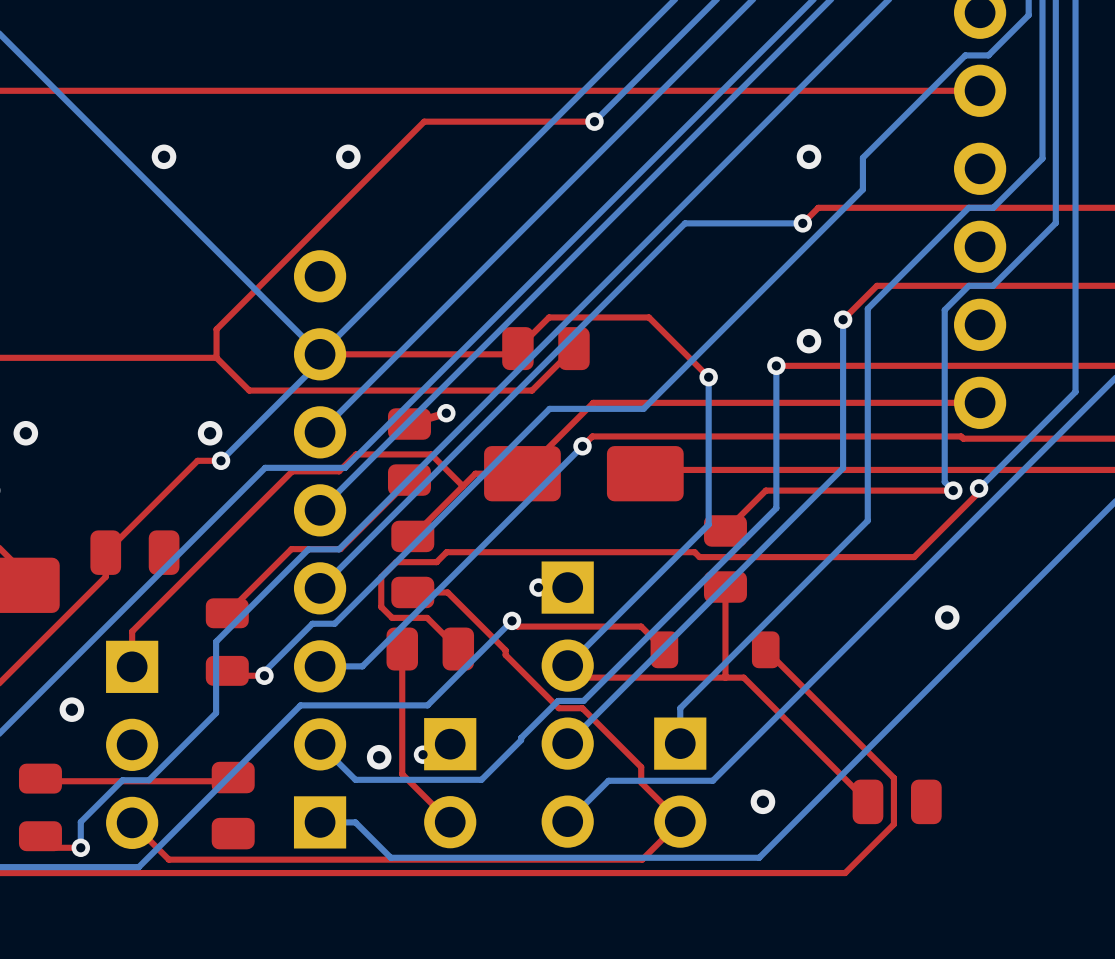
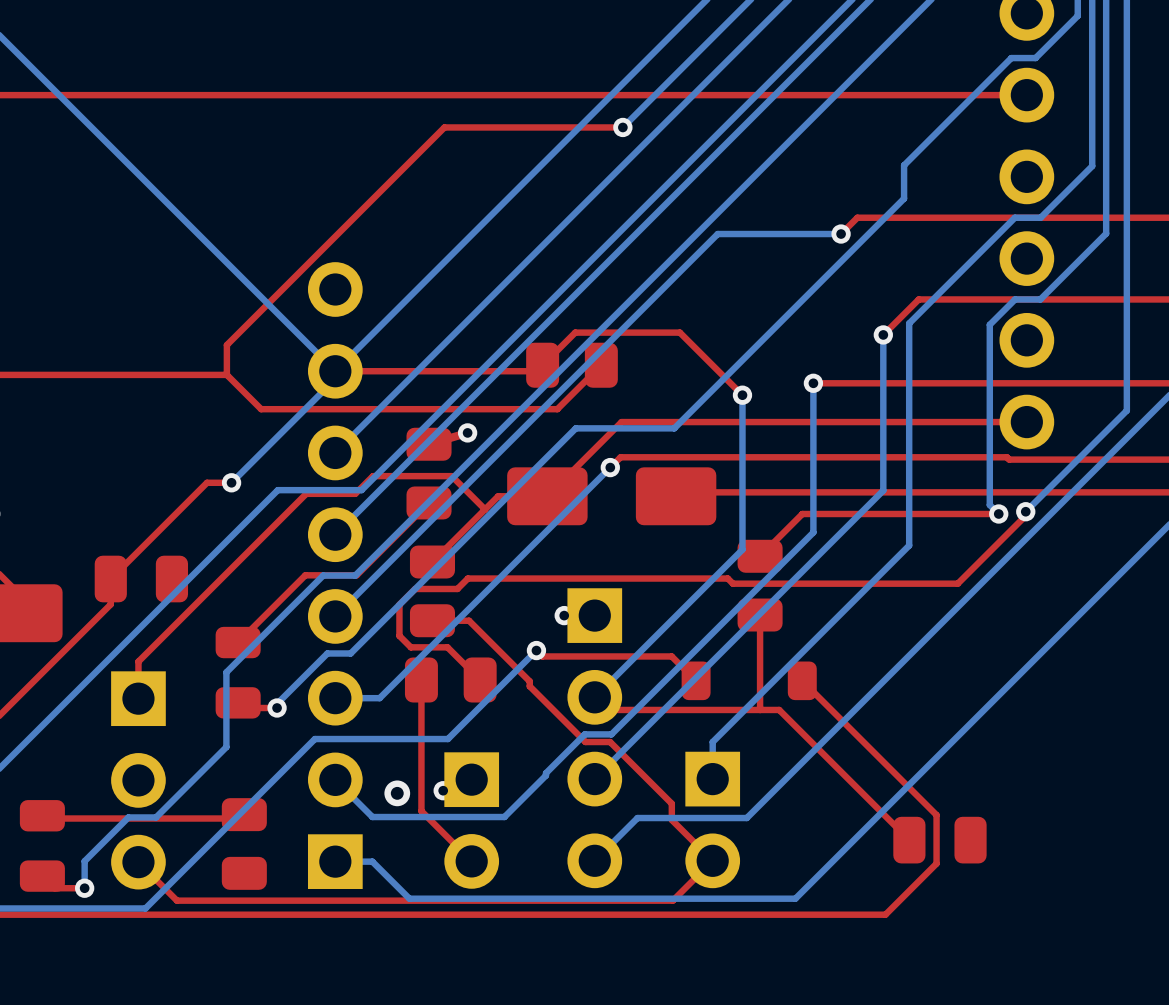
via: (164, 156) -> none
via: (348, 156) -> none
via: (809, 156) -> none
via: (809, 341) -> none
via: (25, 433) -> none
via: (210, 433) -> none
via: (947, 617) -> none
via: (71, 709) -> none
via: (762, 801) -> none

